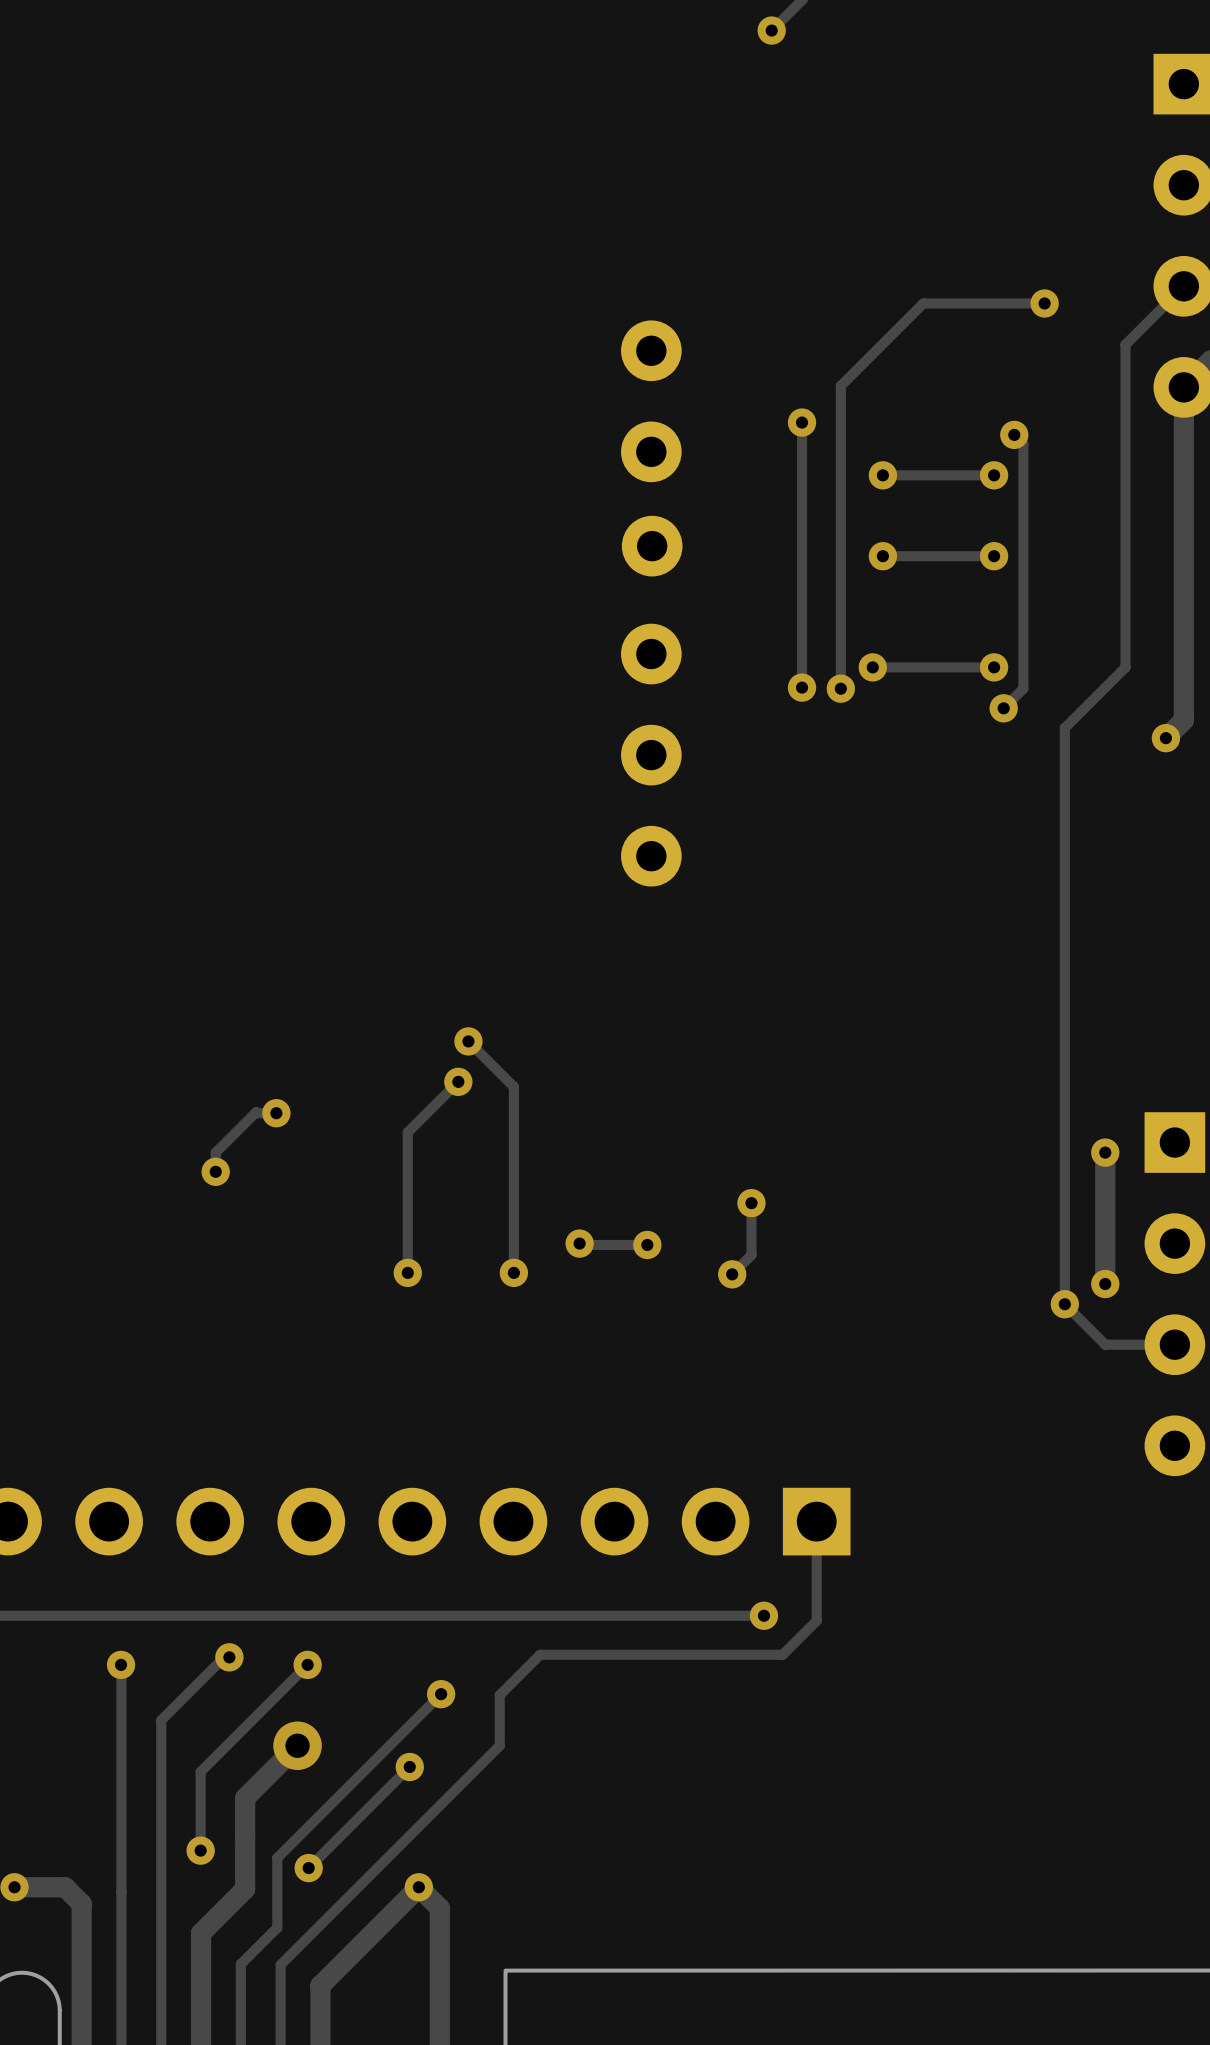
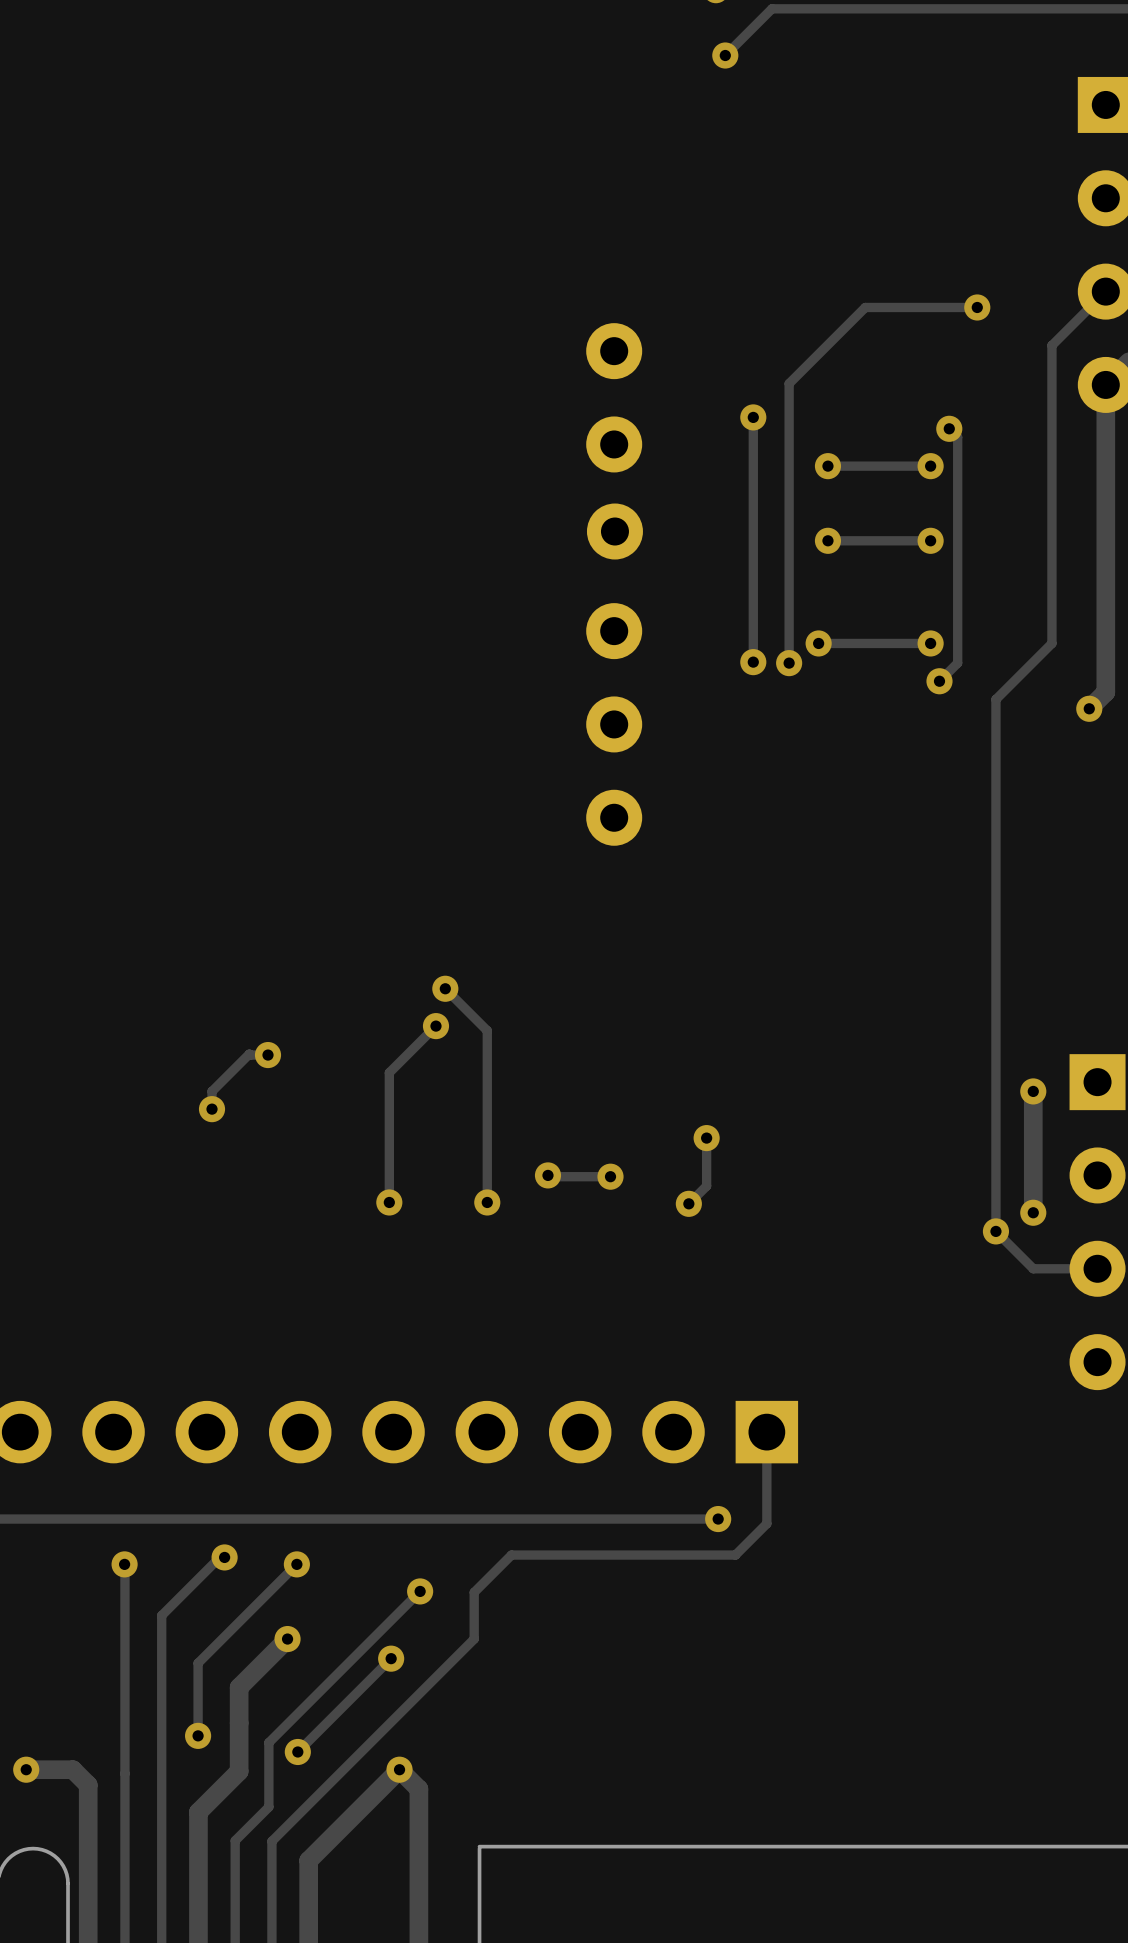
via size: [273, 1721, 322, 1771] -> [274, 1625, 301, 1653]

